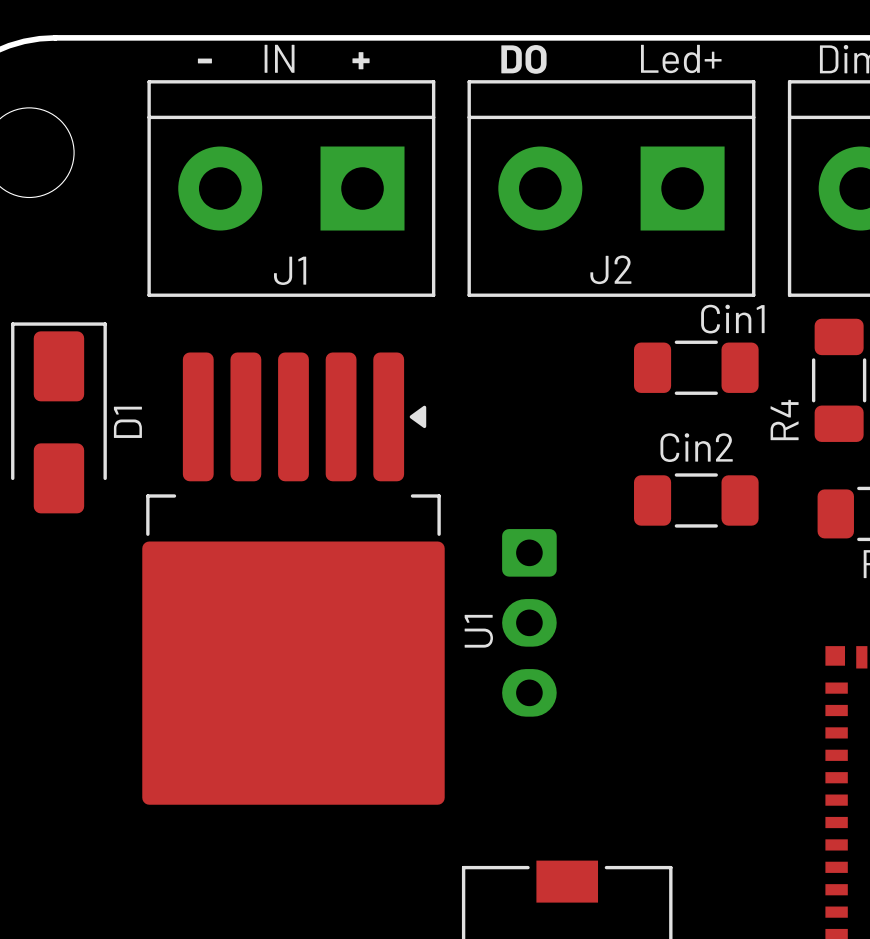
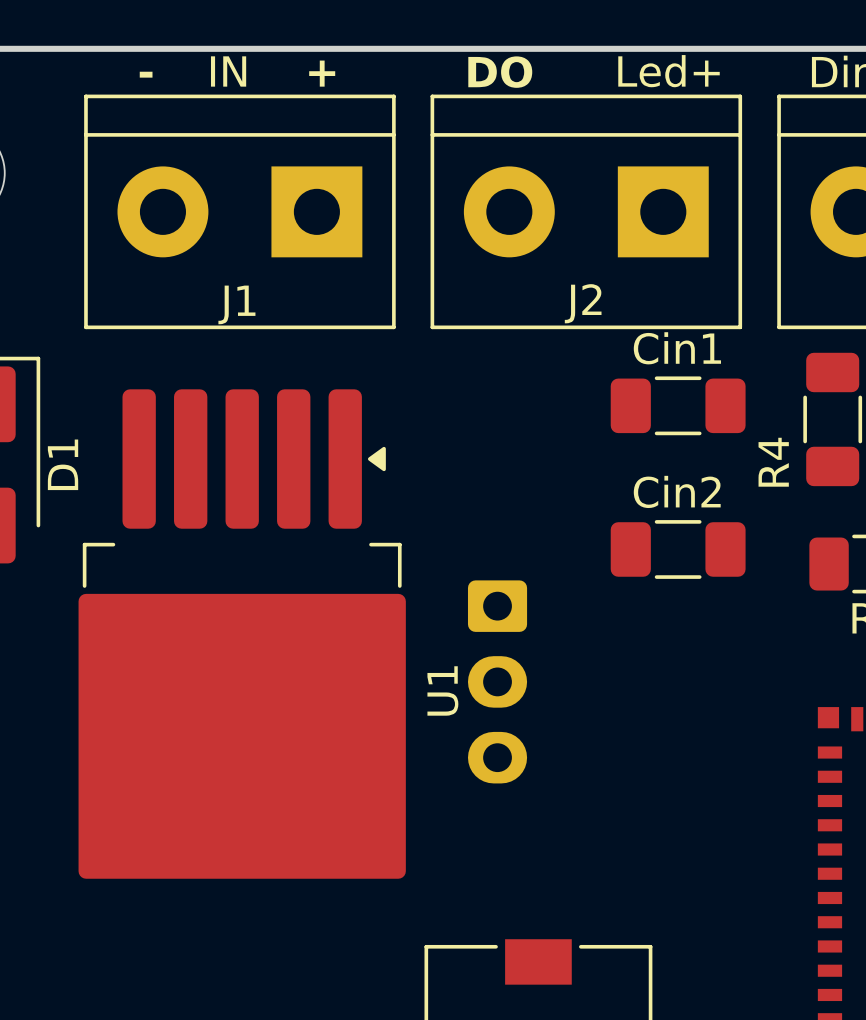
Cin1 name position: Cin1 (732, 319) -> Cin1 (677, 348)

